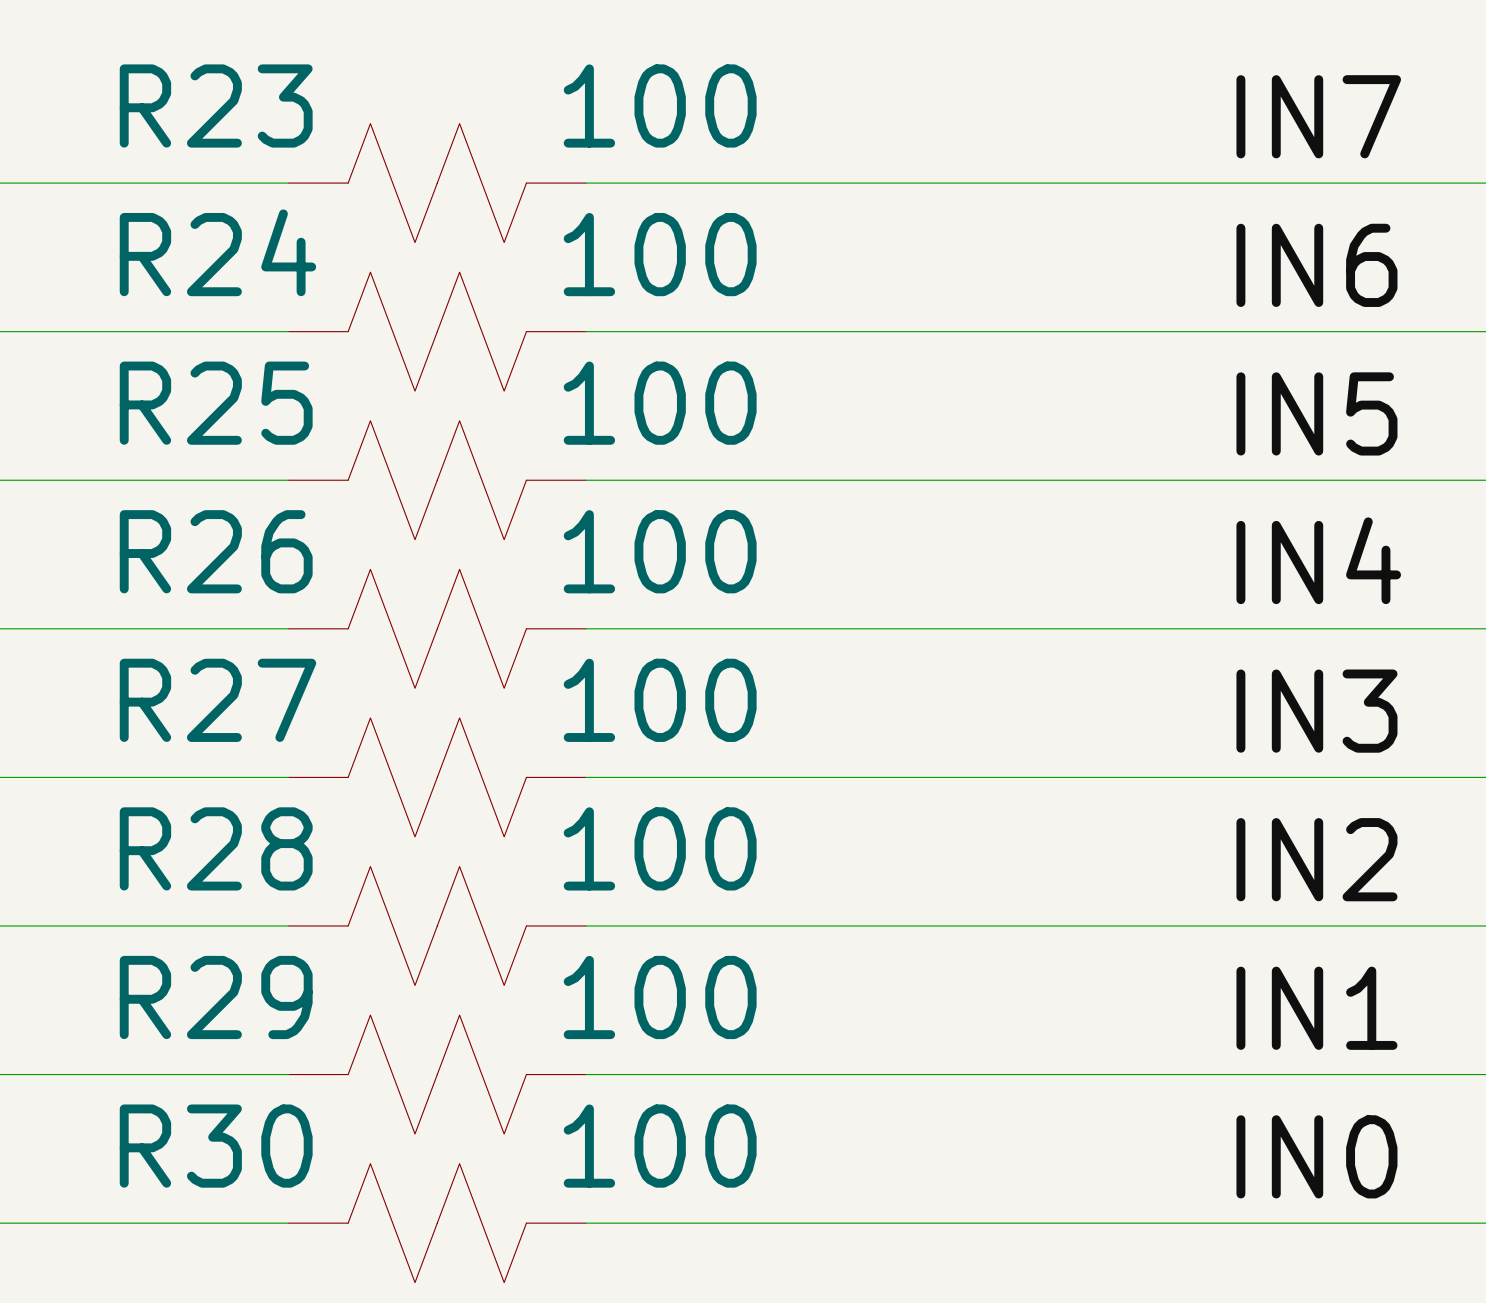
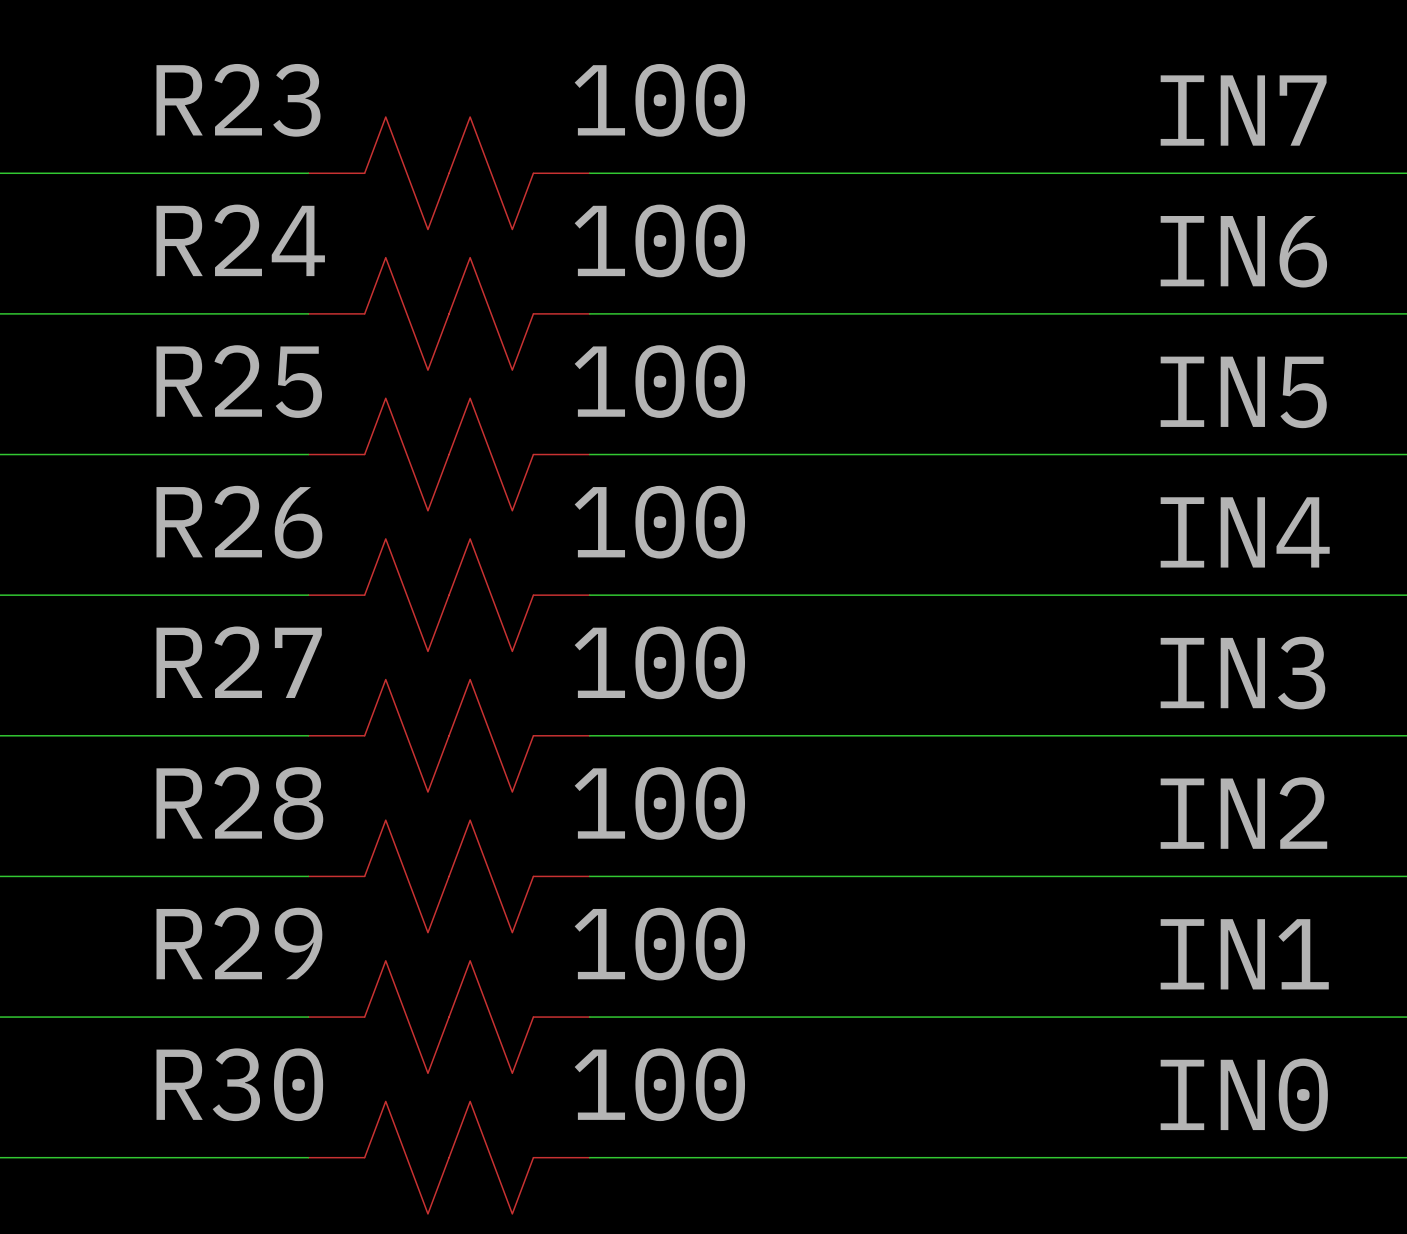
R23 position: (437, 183) -> (449, 173)
R24 position: (437, 331) -> (449, 313)
R25 position: (437, 480) -> (449, 454)
R26 position: (437, 628) -> (449, 595)
R27 position: (437, 777) -> (449, 735)
R28 position: (437, 925) -> (449, 876)
R29 position: (437, 1074) -> (449, 1017)
R30 position: (437, 1223) -> (449, 1157)

